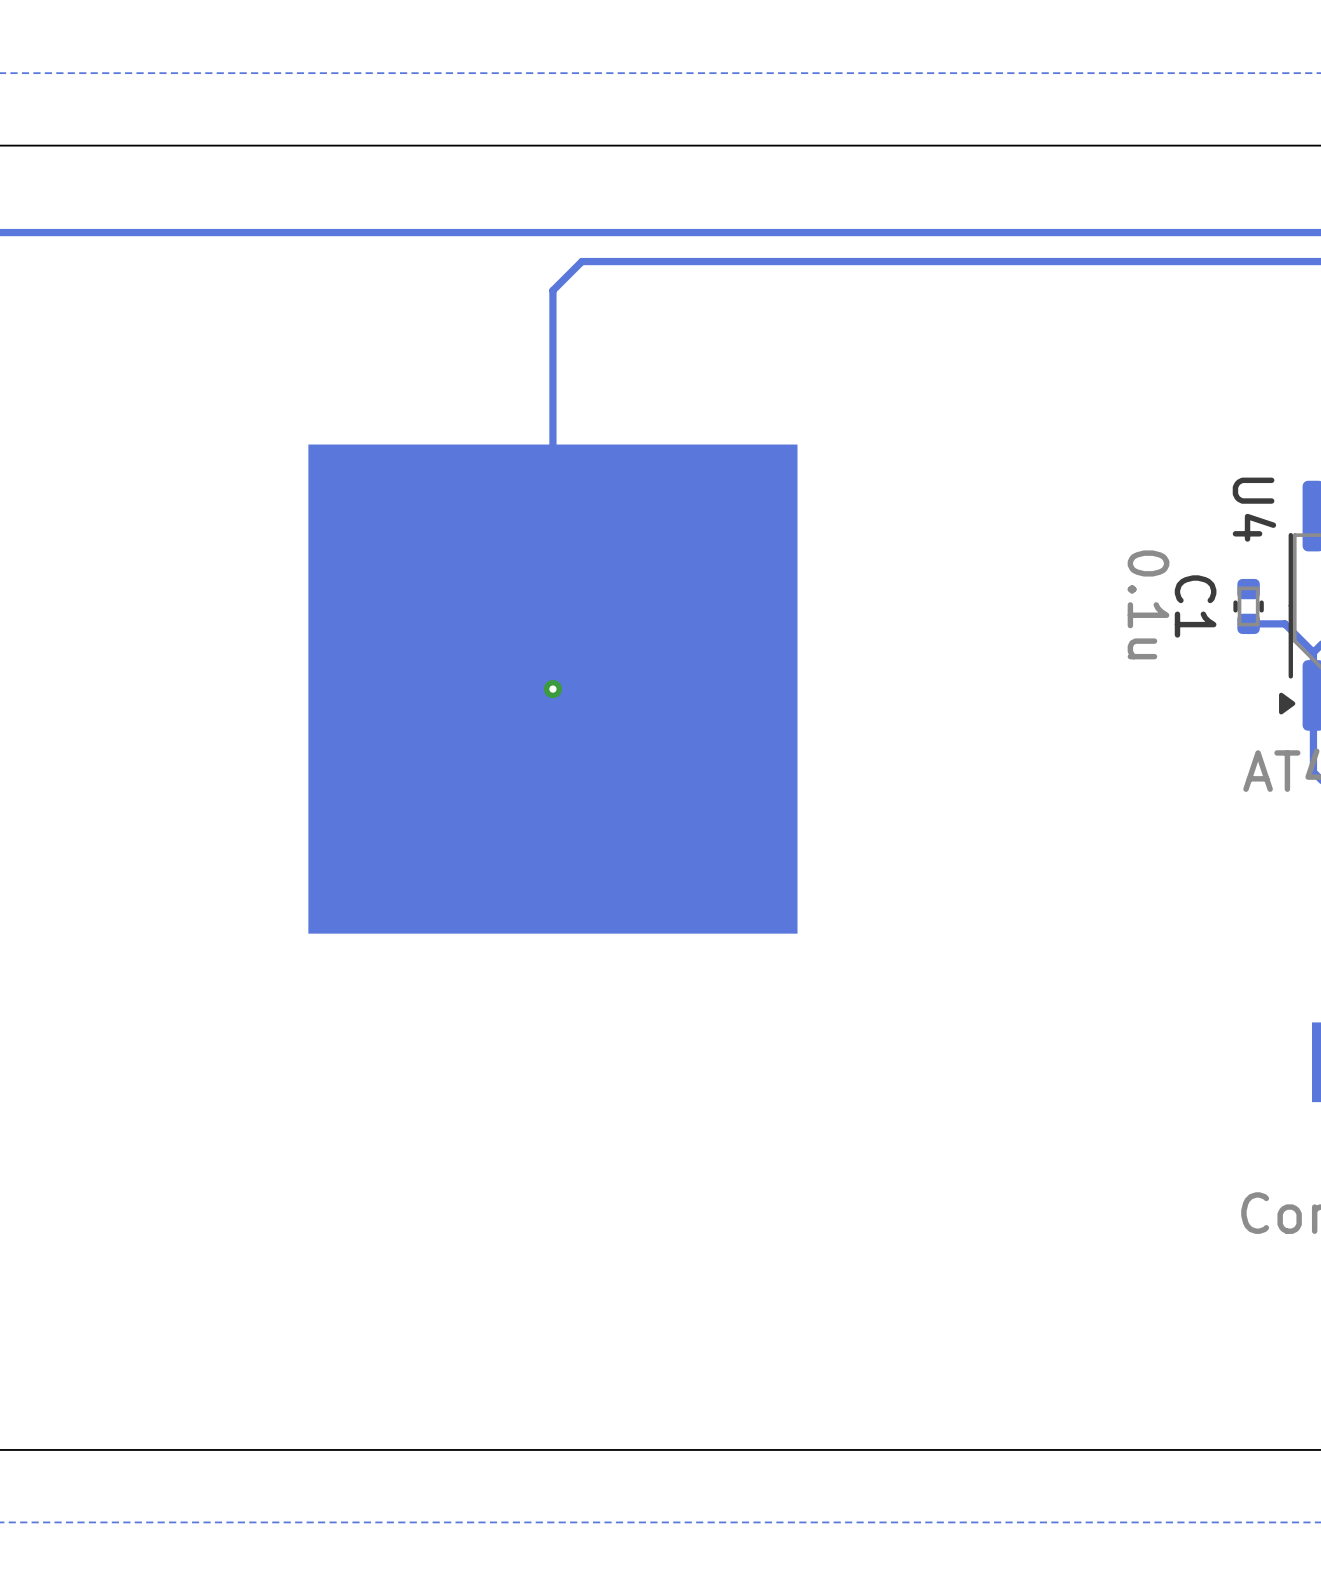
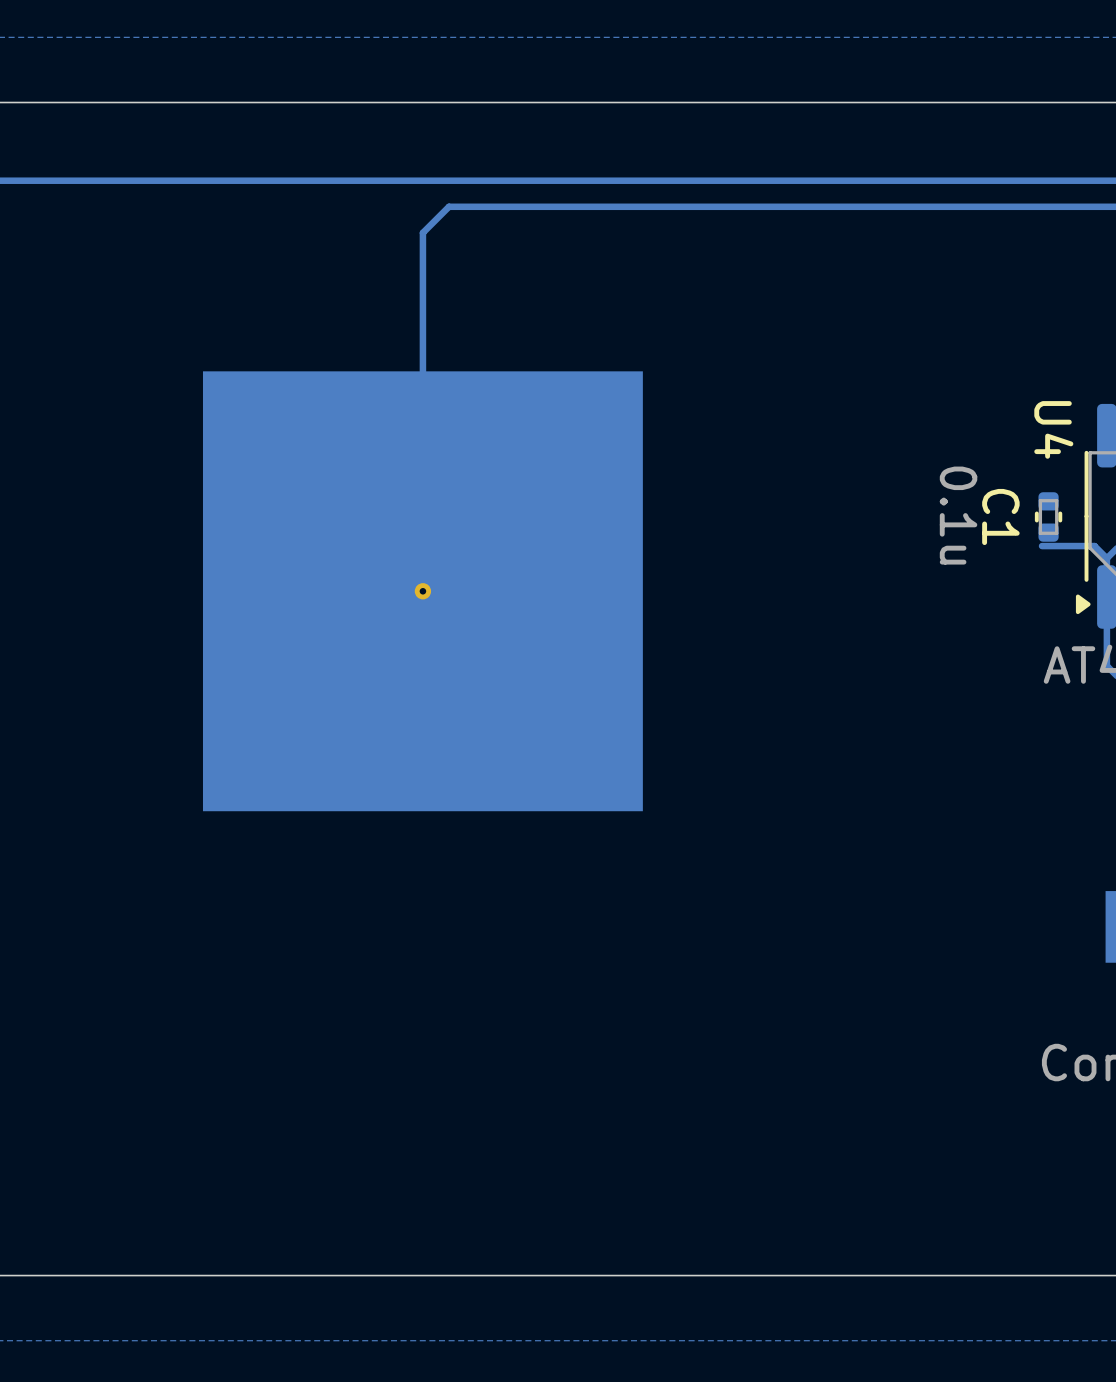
track: (1248, 630) (1248, 623) (1284, 623) (1299, 638) -> (1042, 546) (1094, 546)

